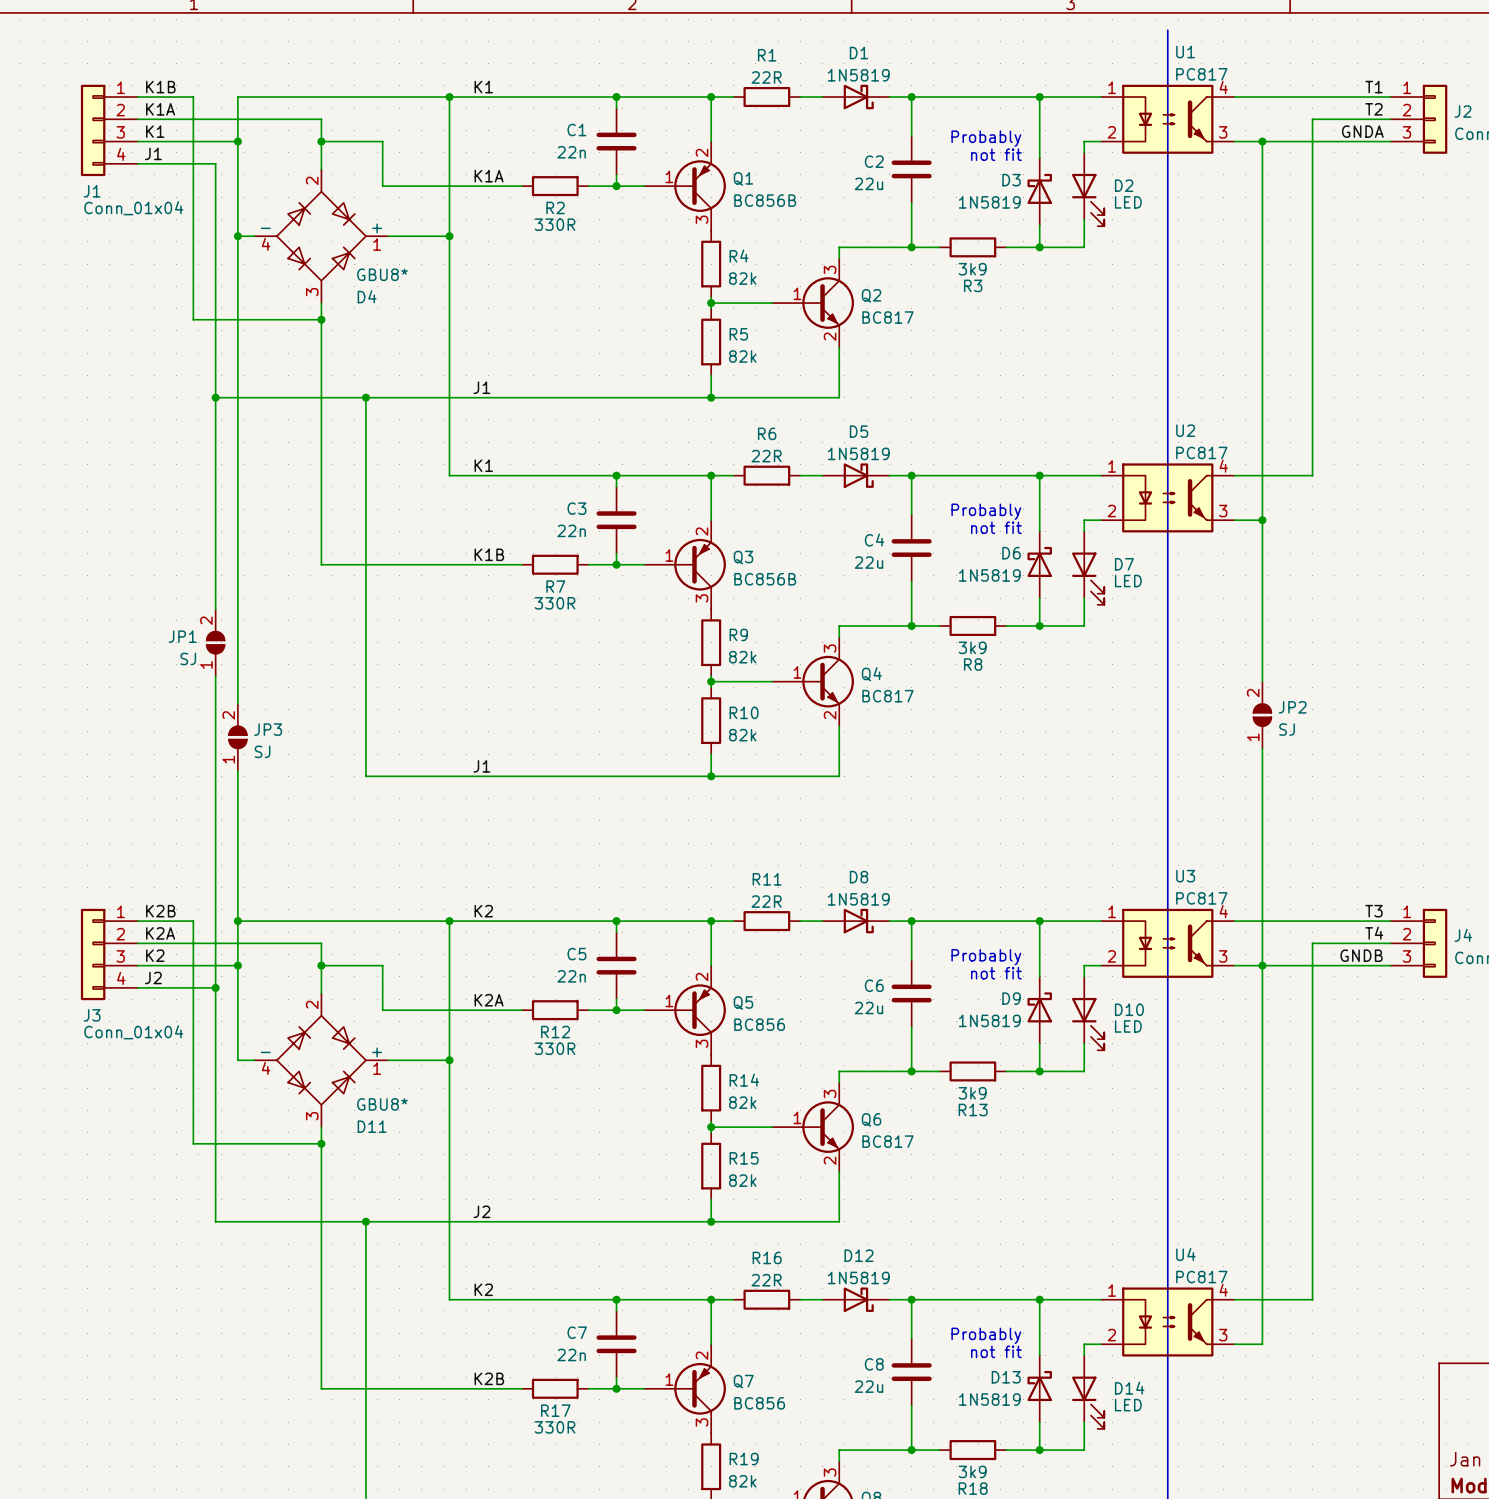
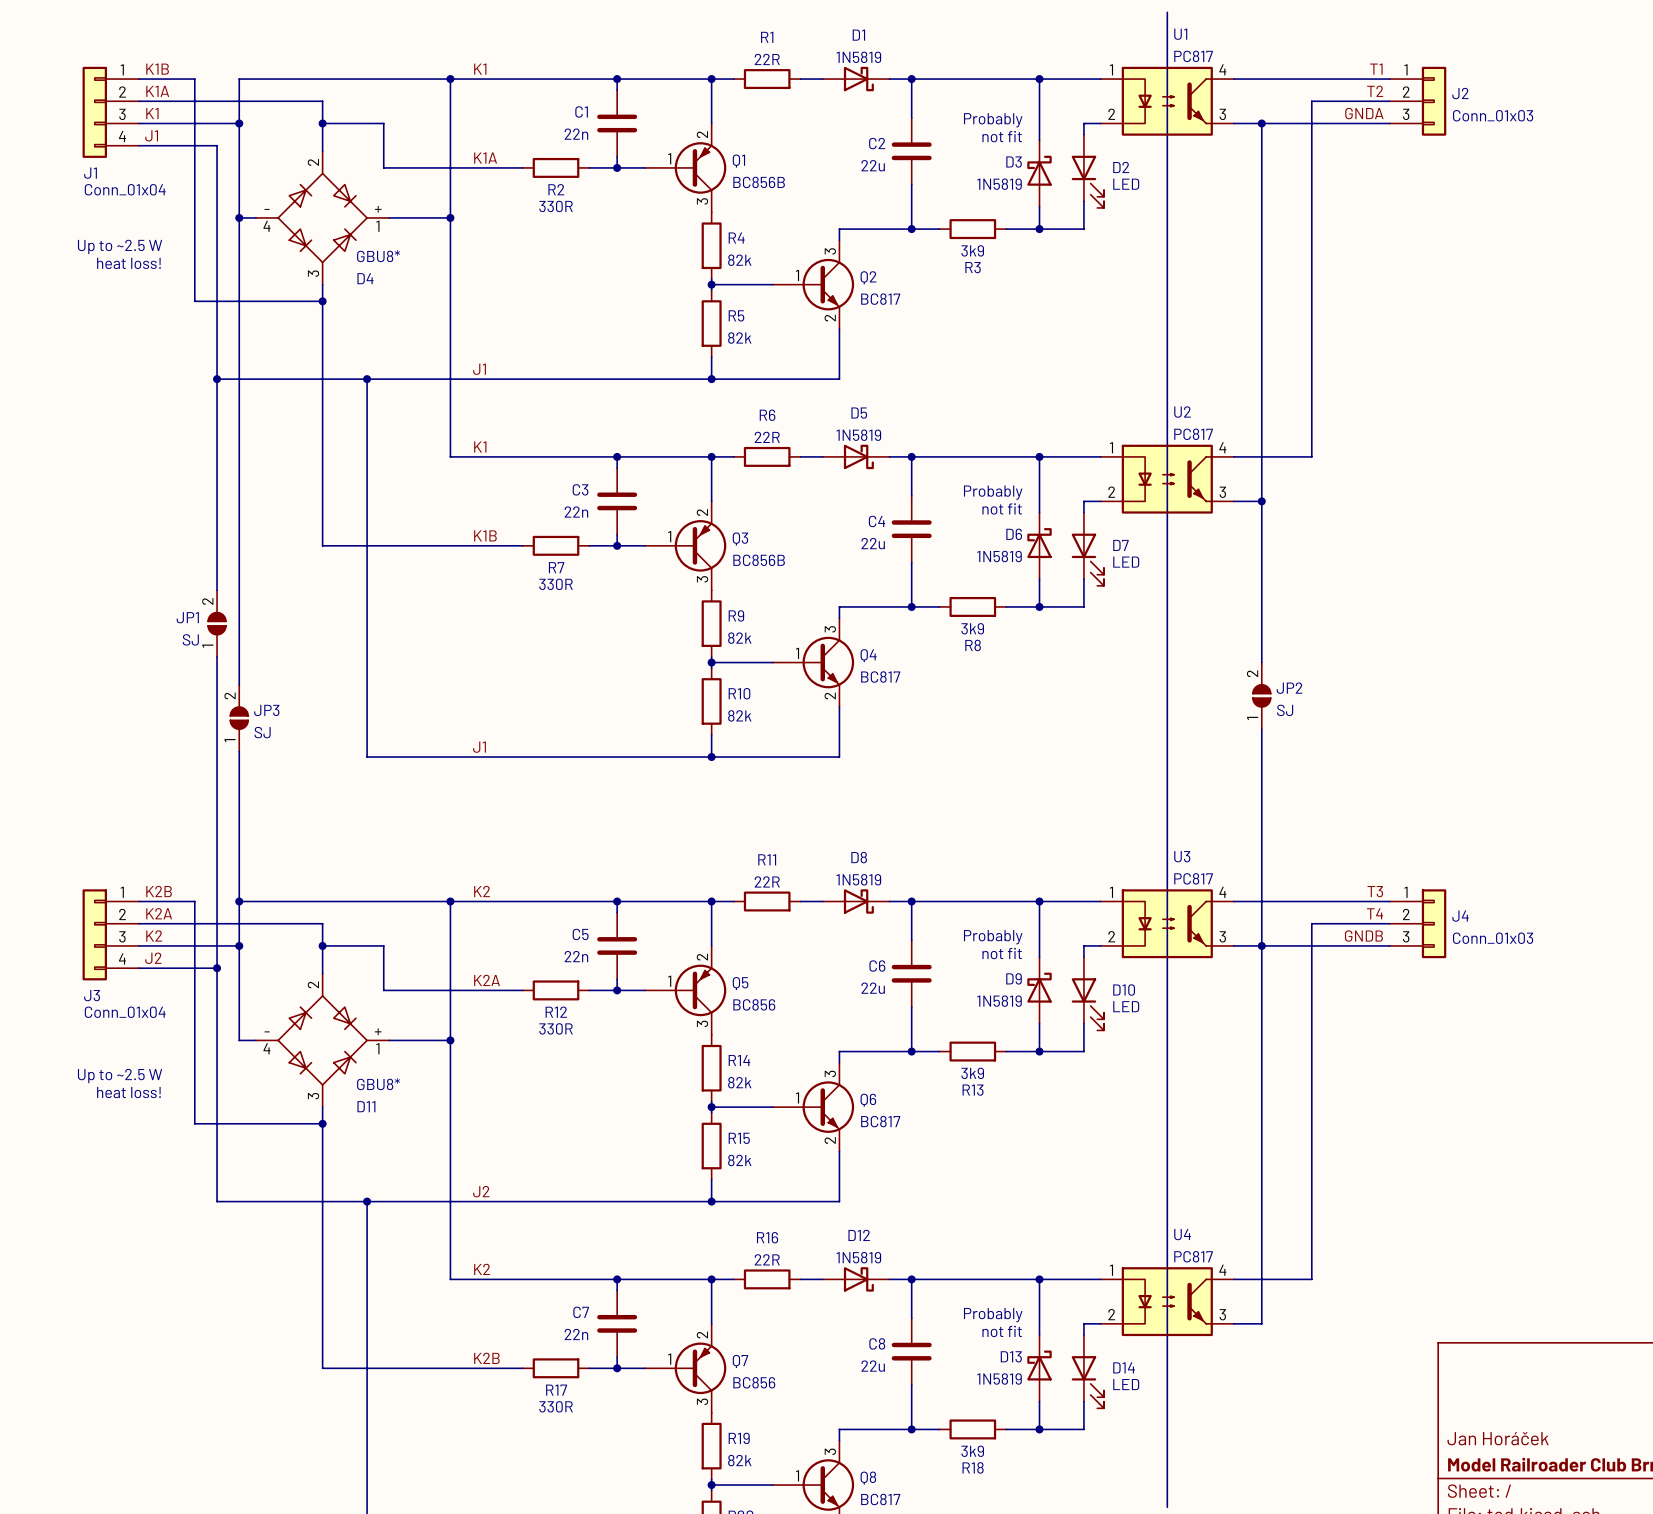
text: none -> Up to ~2.5 W (120, 246)
text: none -> heat loss! (128, 263)
text: none -> Up to ~2.5 W (120, 1076)
text: none -> heat loss! (128, 1092)

